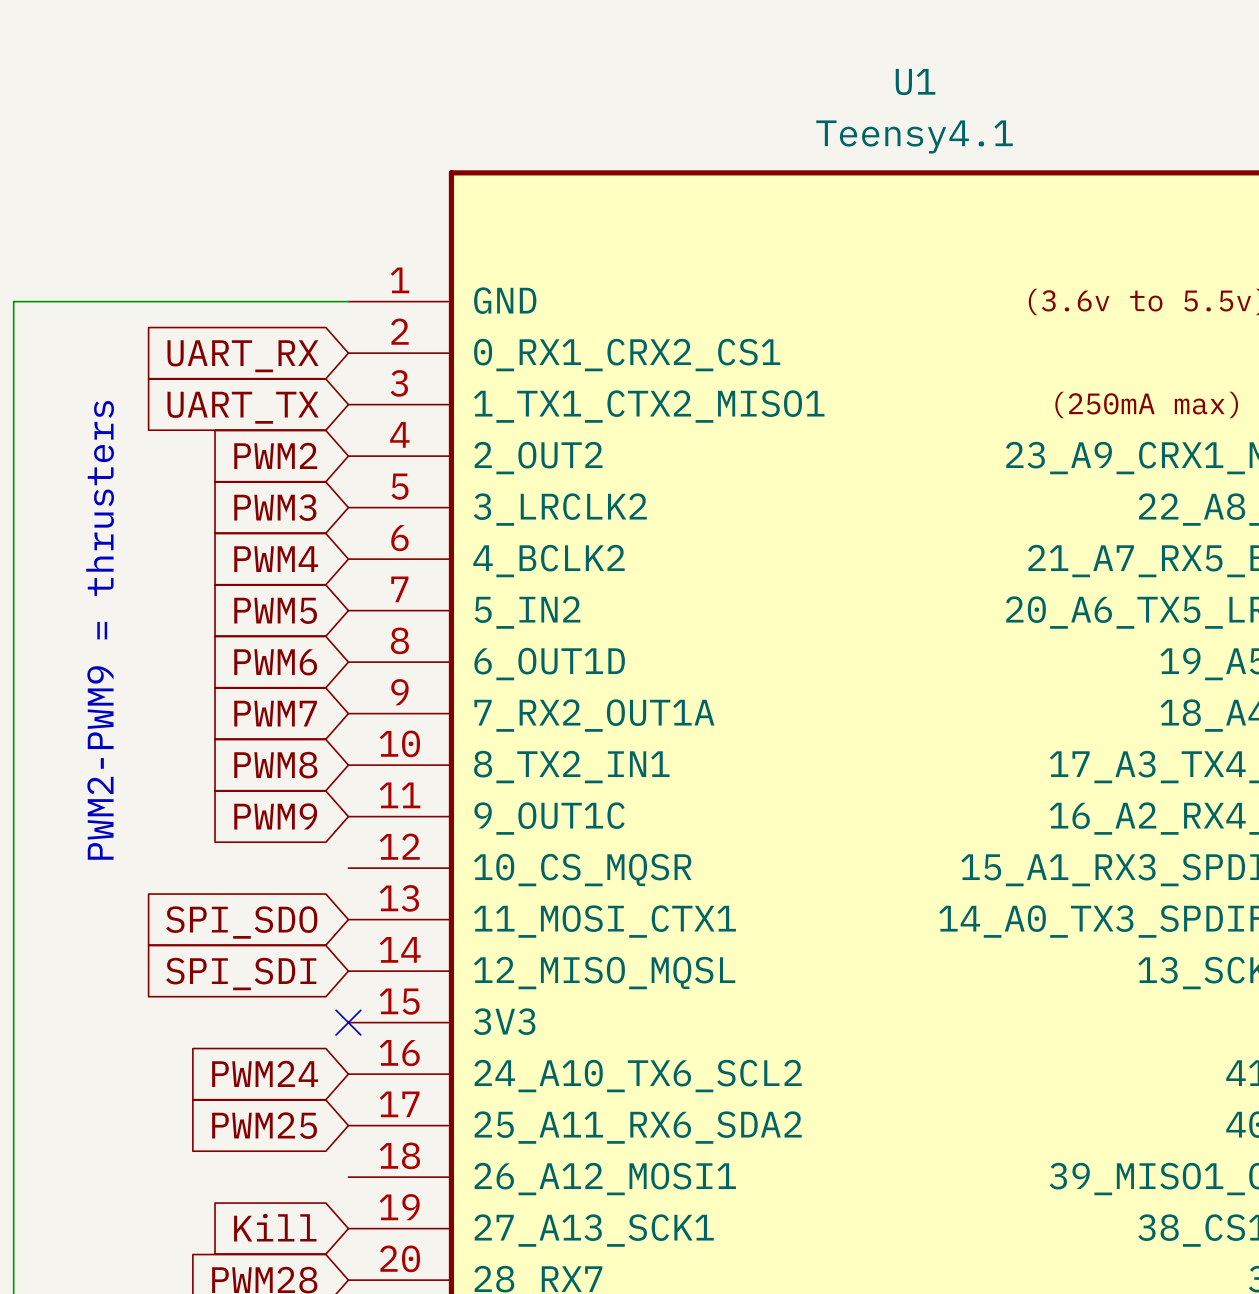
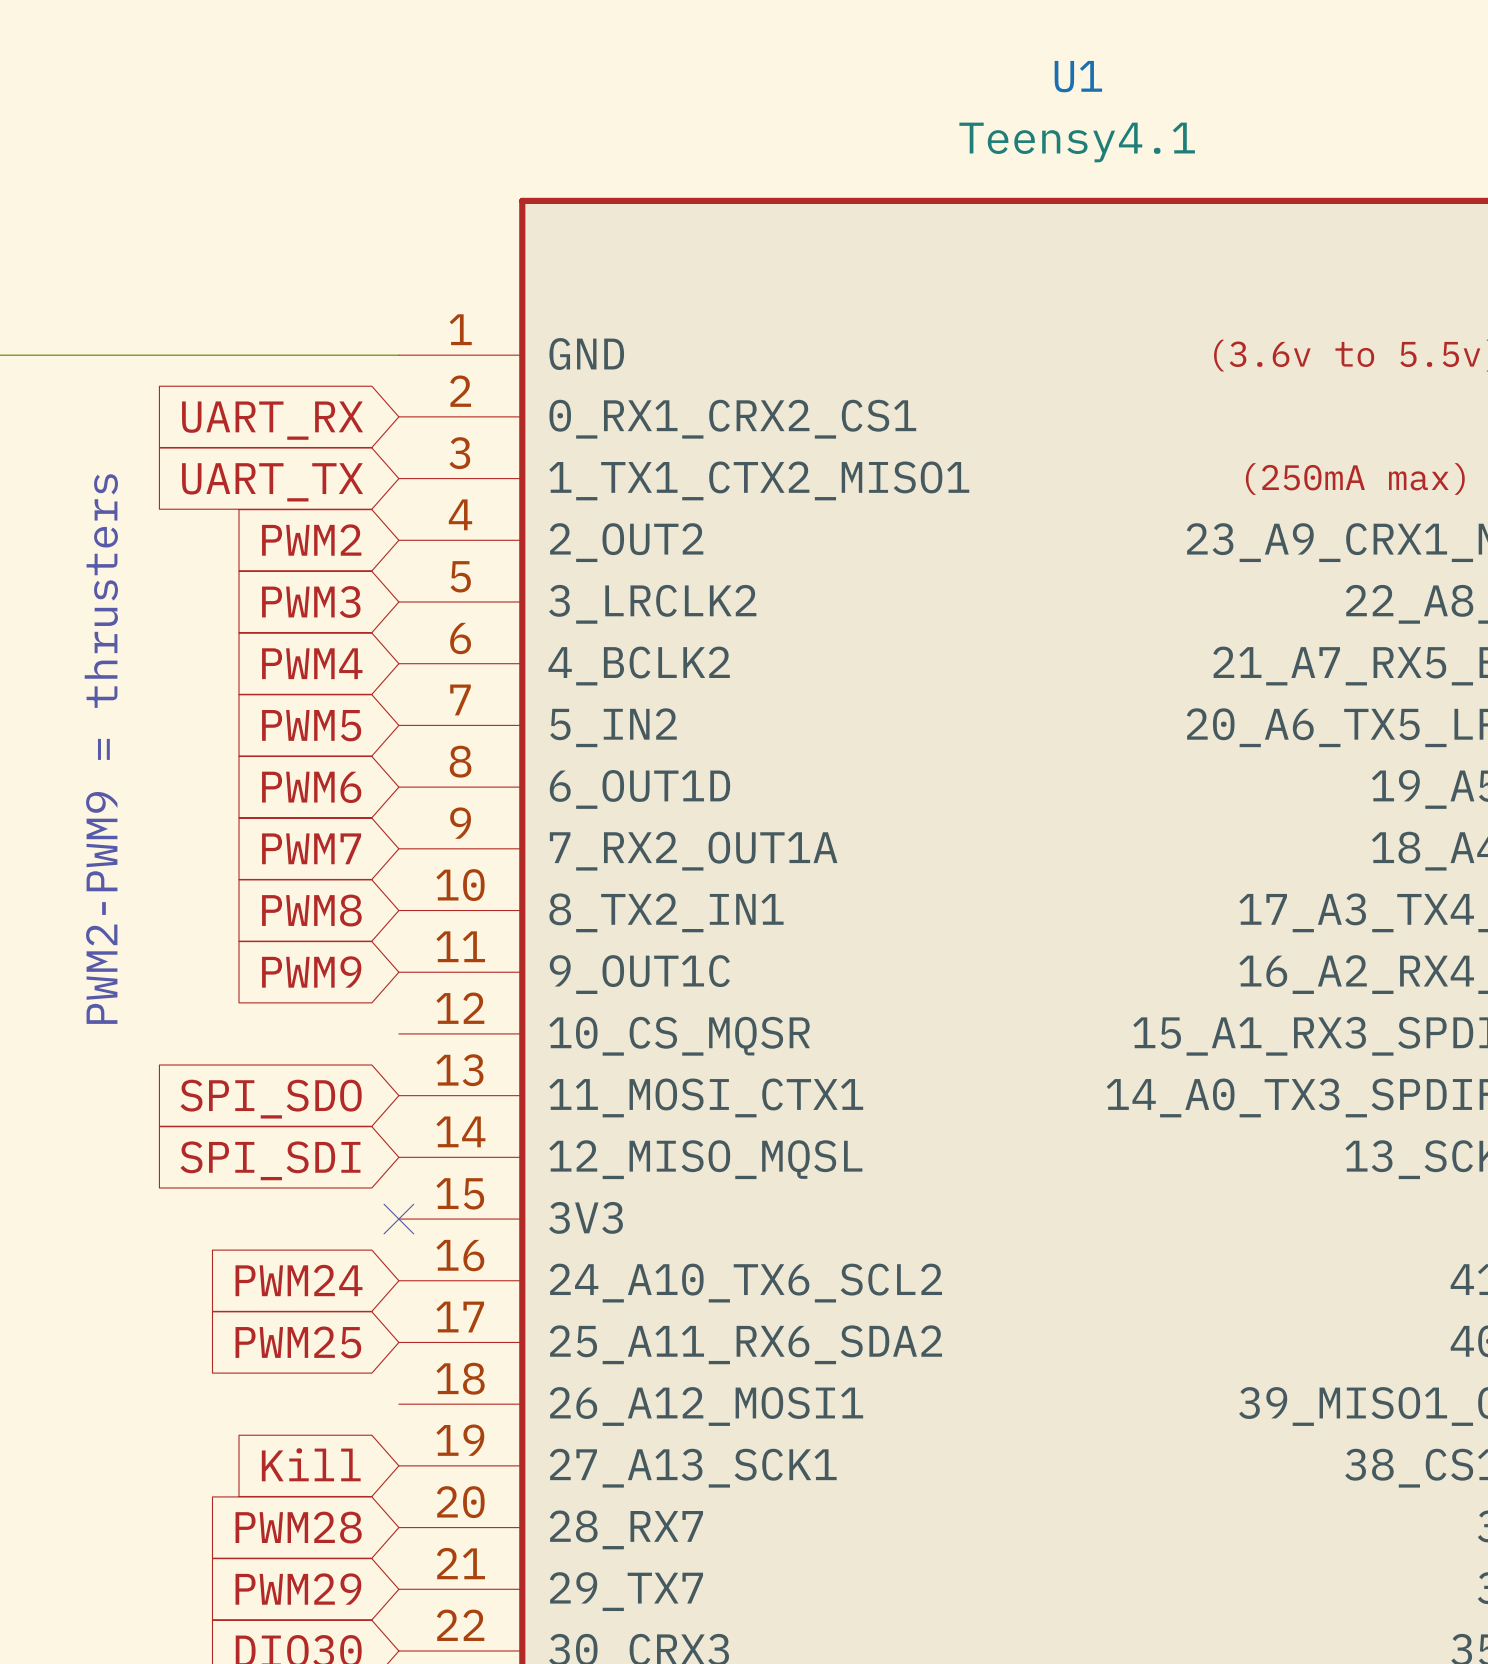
U1 name position: U1 (915, 82) -> U1 (1078, 76)
U1 value position: Teensy4.1 (914, 136) -> Teensy4.1 (1077, 142)

